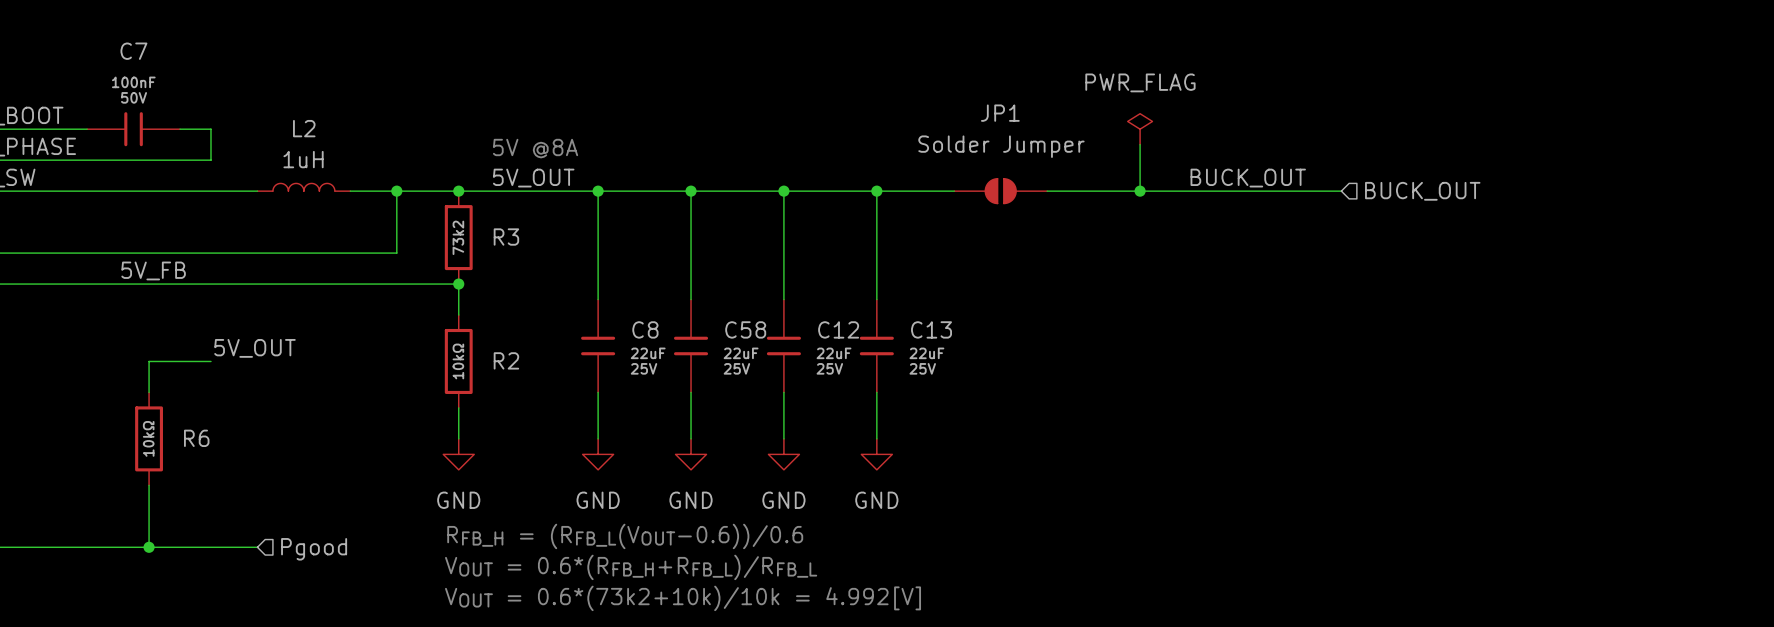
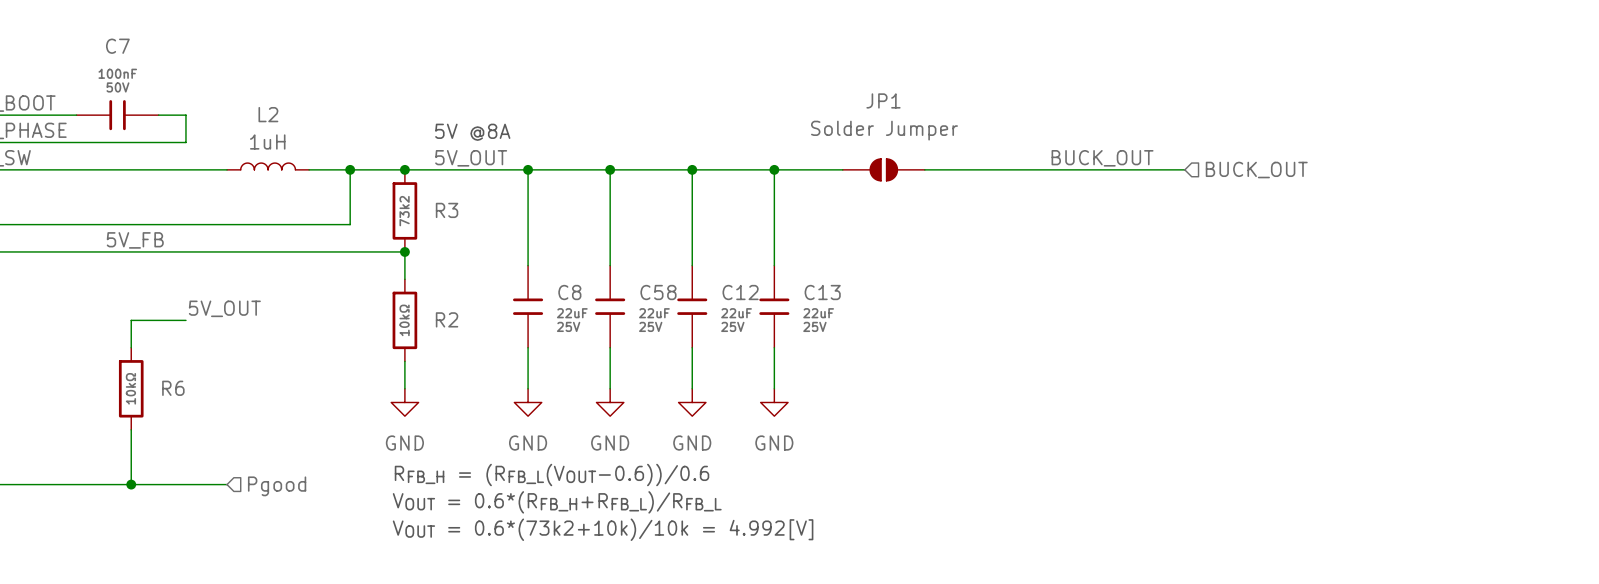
power symbol: PWR_FLAG (1140, 129) -> none
wire: (1140, 144) (1140, 191) -> none
junction: (1140, 191) -> none

